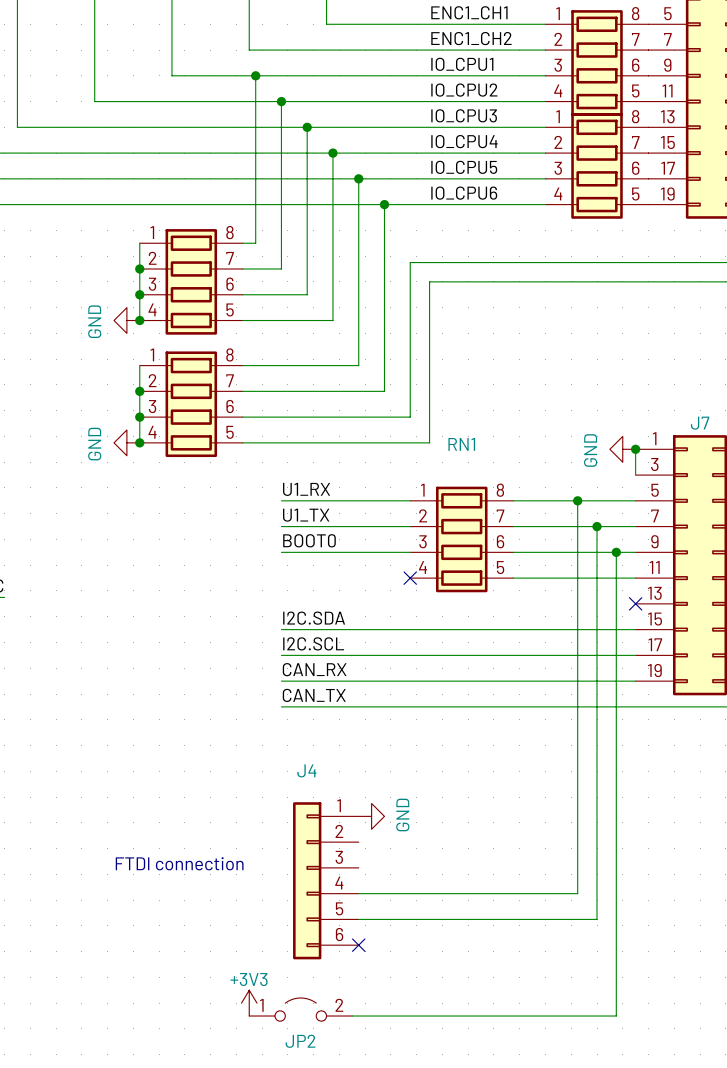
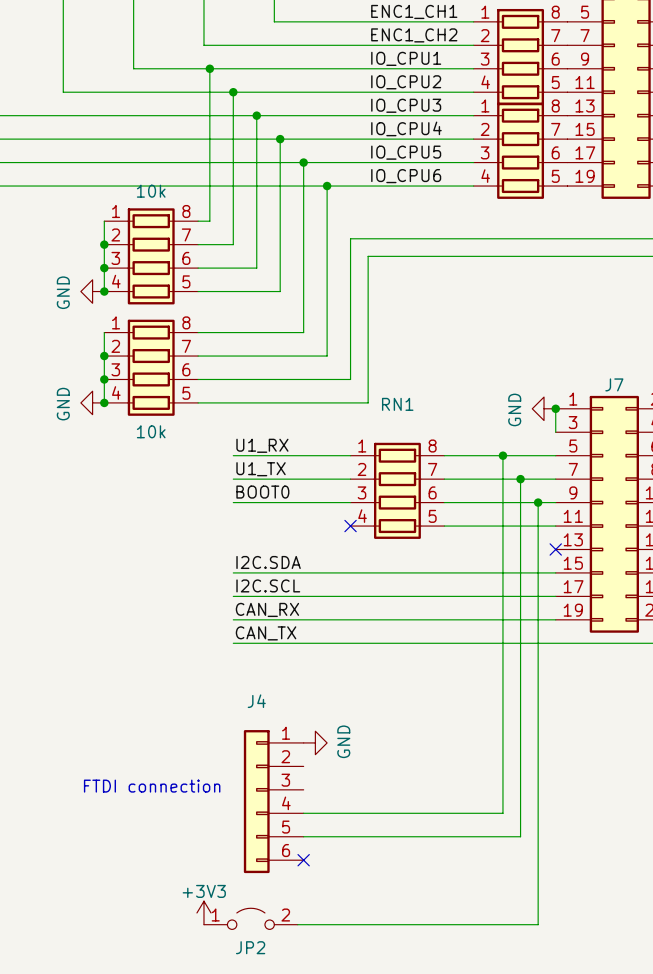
part value: none -> 10k (151, 191)
part value: none -> 10k (151, 431)

